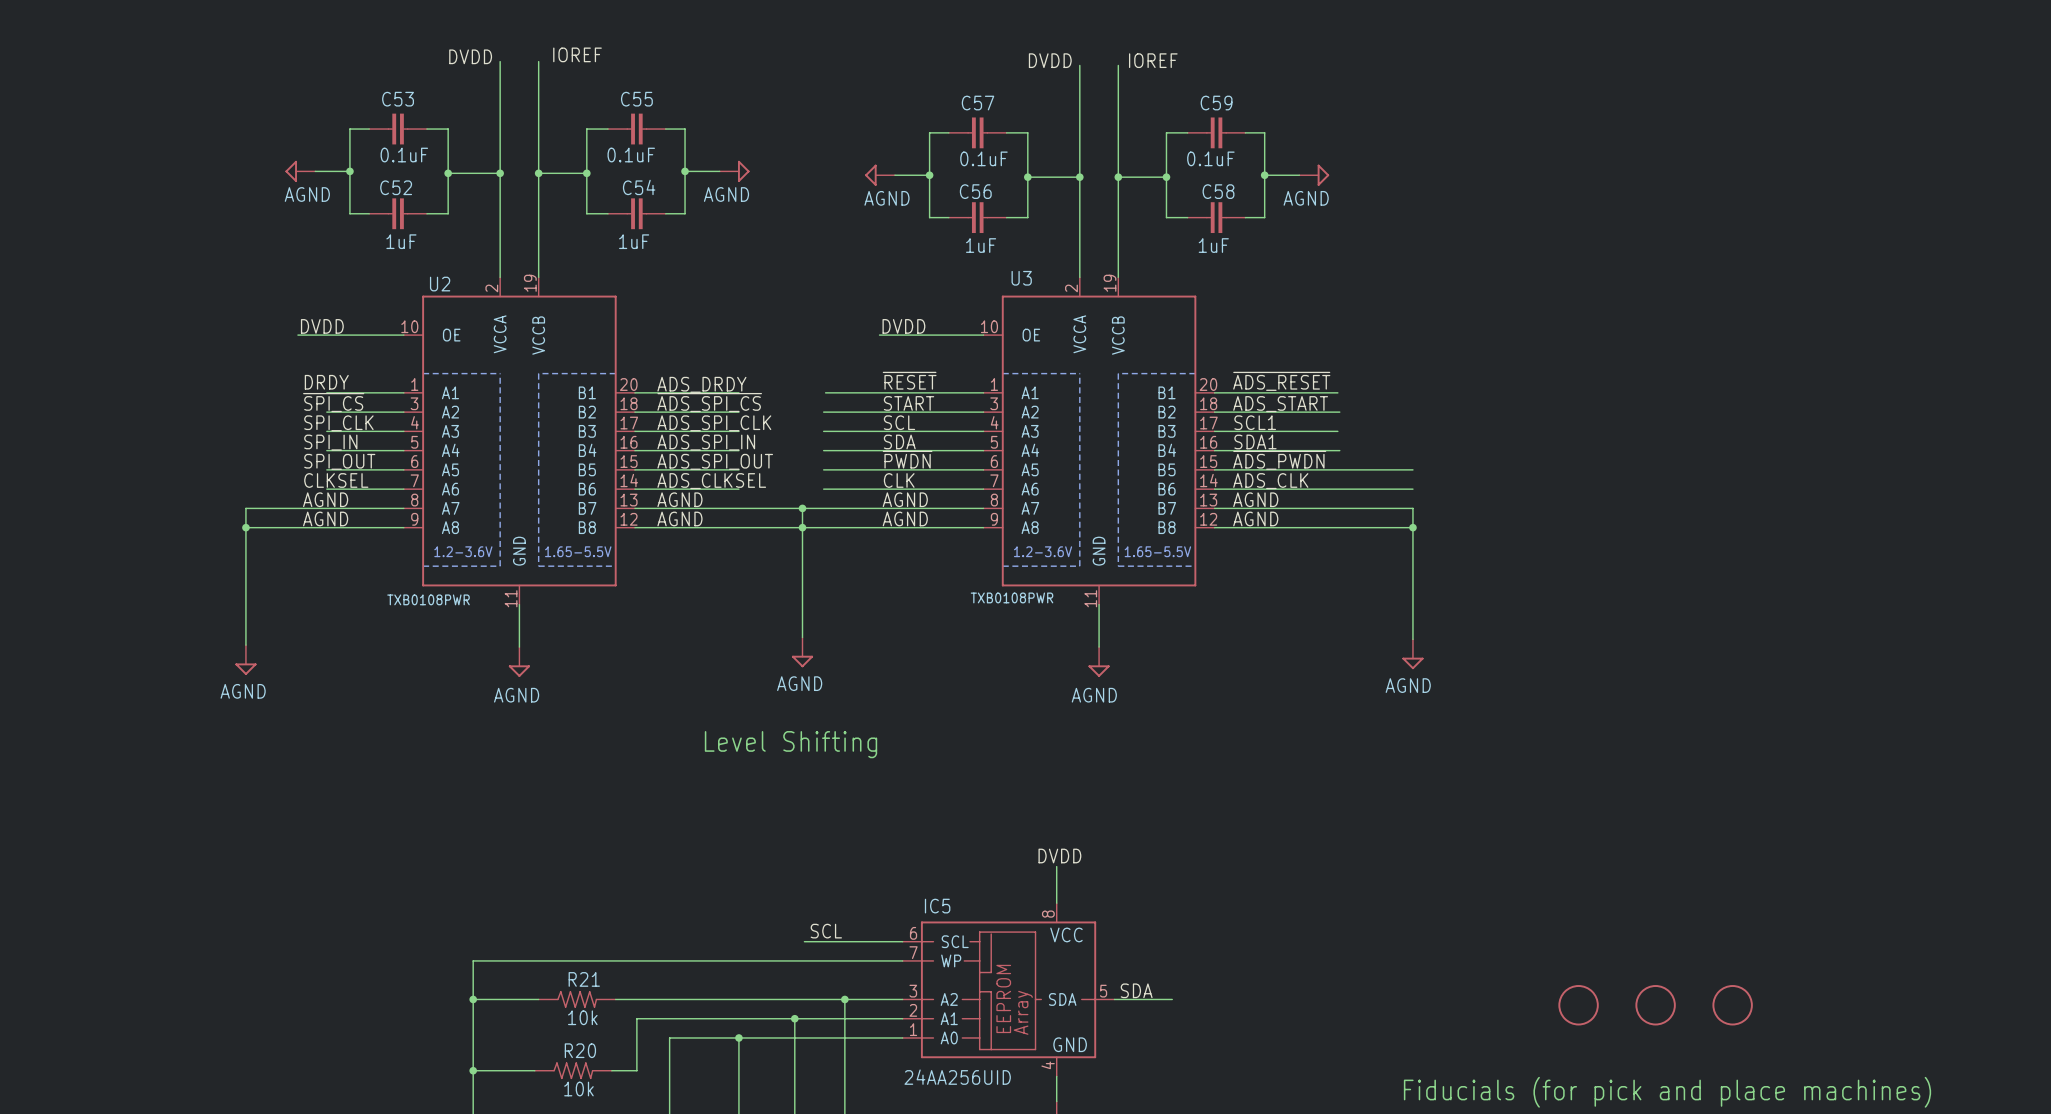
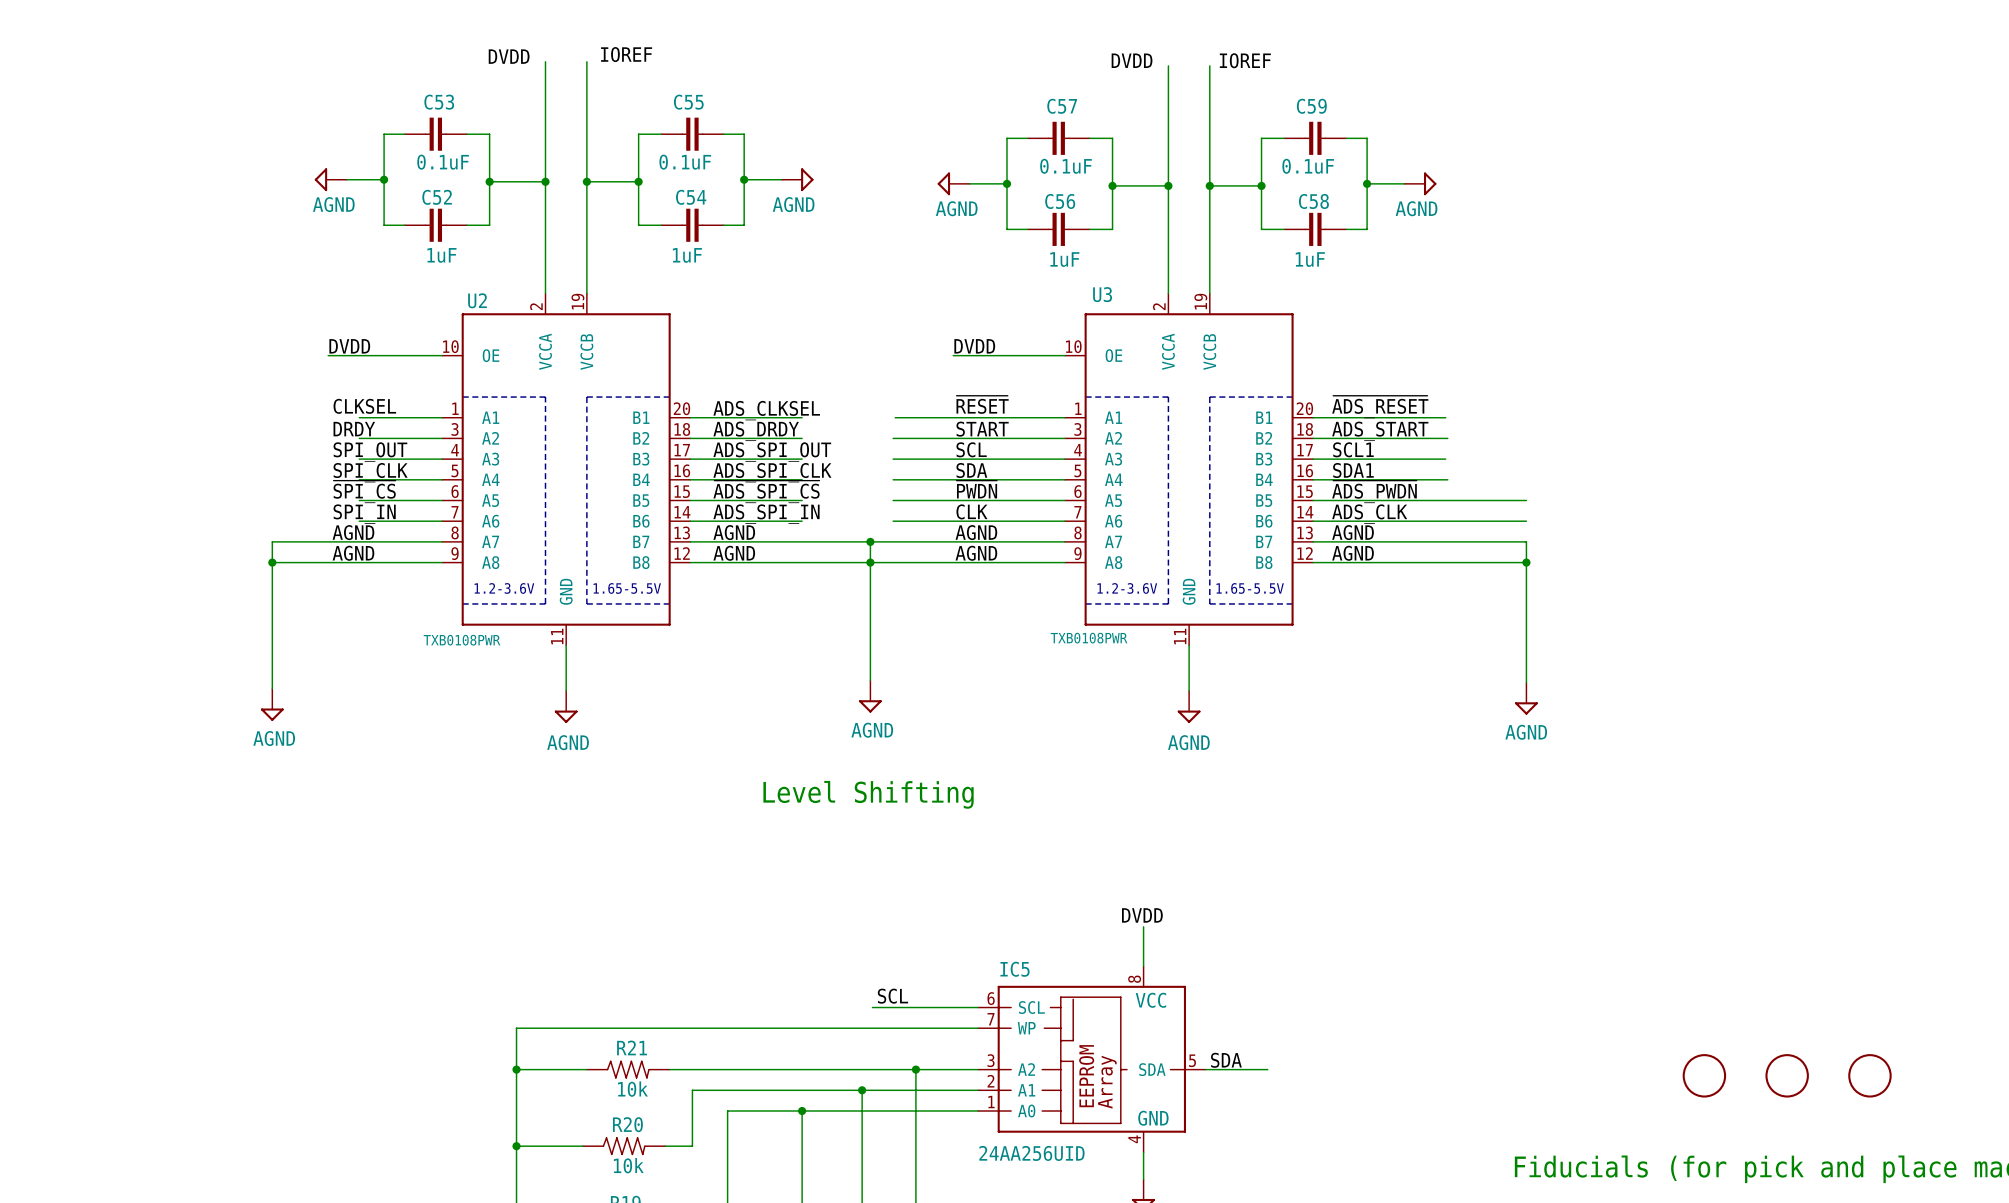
label: DRDY (326, 382) -> CLKSEL (364, 406)
label: ADS_DRDY (701, 384) -> ADS_CLKSEL (766, 410)
label: ~{SPI_CS} (333, 402) -> DRDY (354, 429)
label: ~{ADS_SPI_CS} (709, 402) -> ADS_DRDY (756, 431)
label: SPI_CLK (338, 423) -> SPI_OUT (370, 452)
label: ADS_SPI_CLK (714, 423) -> ADS_SPI_OUT (772, 452)
label: SPI_IN (330, 442) -> SPI_CLK (370, 472)
label: ADS_SPI_IN (706, 442) -> ADS_SPI_CLK (772, 472)
label: SPI_OUT (339, 461) -> ~{SPI_CS} (364, 491)
label: ADS_SPI_OUT (715, 461) -> ~{ADS_SPI_CS} (766, 491)
label: CLKSEL (336, 480) -> SPI_IN (364, 514)
label: ADS_CLKSEL (711, 481) -> ADS_SPI_IN (766, 514)

